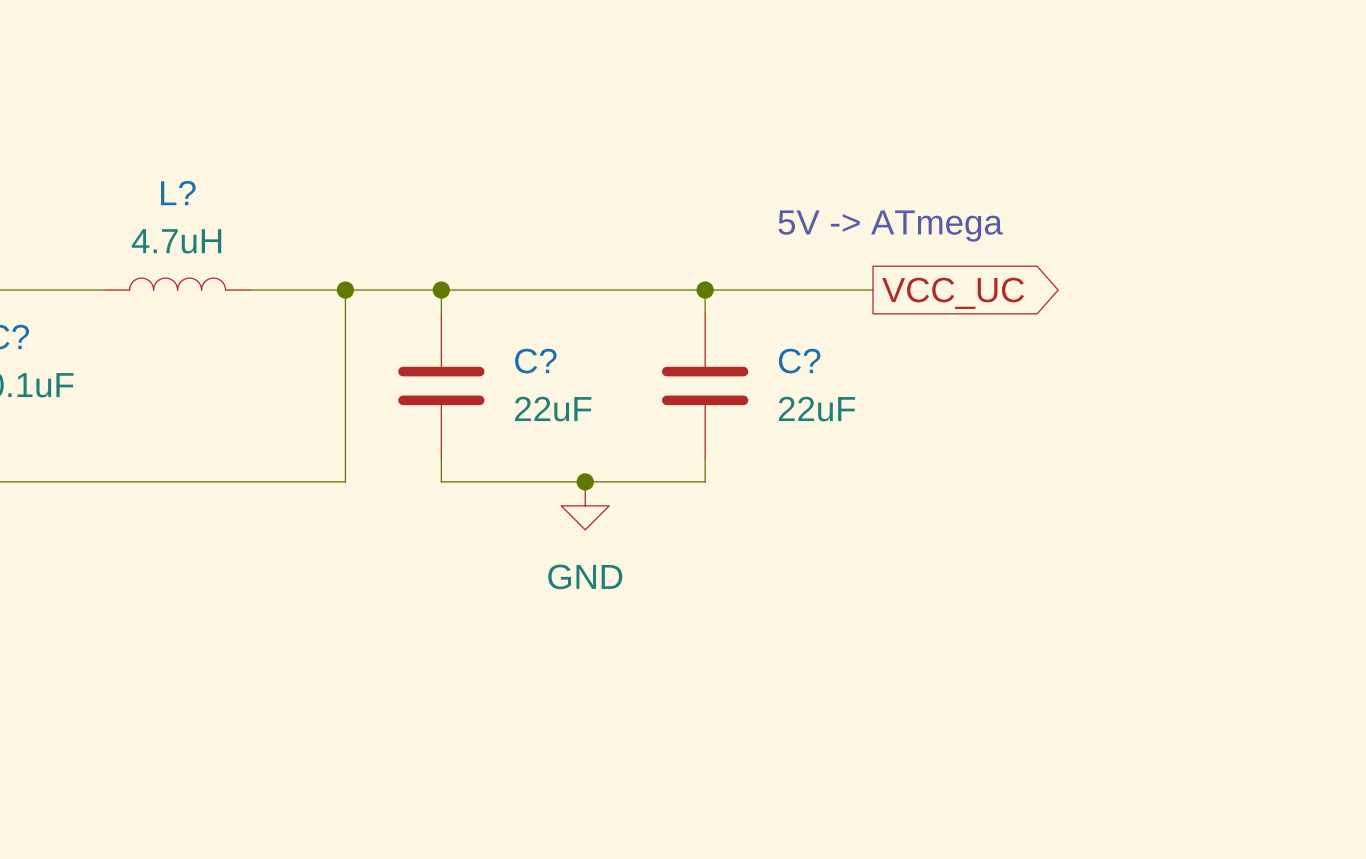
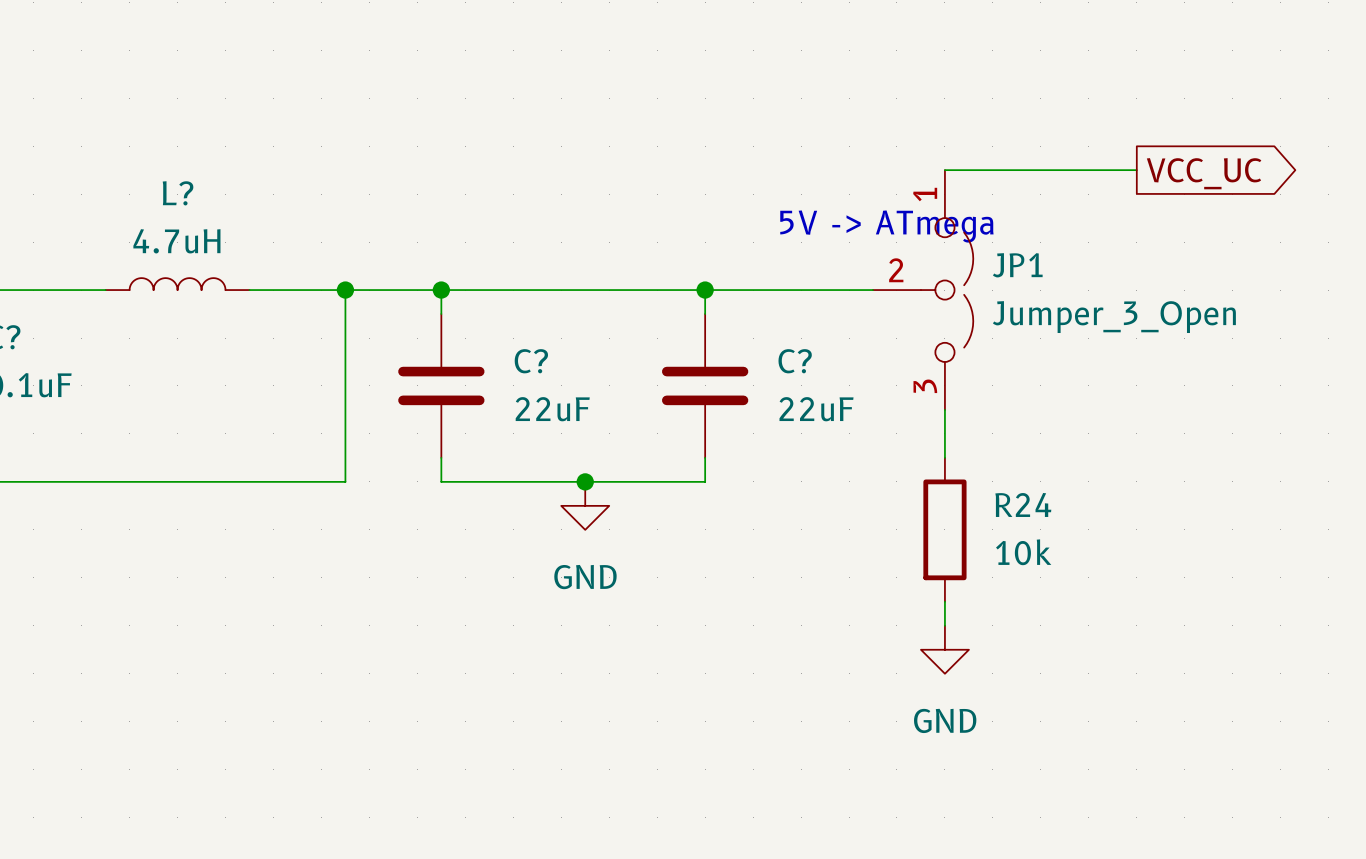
wire: none -> (944, 170) (1136, 170)
JP1: none -> Jumper_3_Open (923, 290)
global label position: VCC_UC (953, 293) -> VCC_UC (1204, 173)
wire: none -> (944, 409) (944, 457)
R24: none -> 10k (944, 529)
wire: none -> (944, 601) (944, 625)
power symbol: none -> GND (944, 649)

